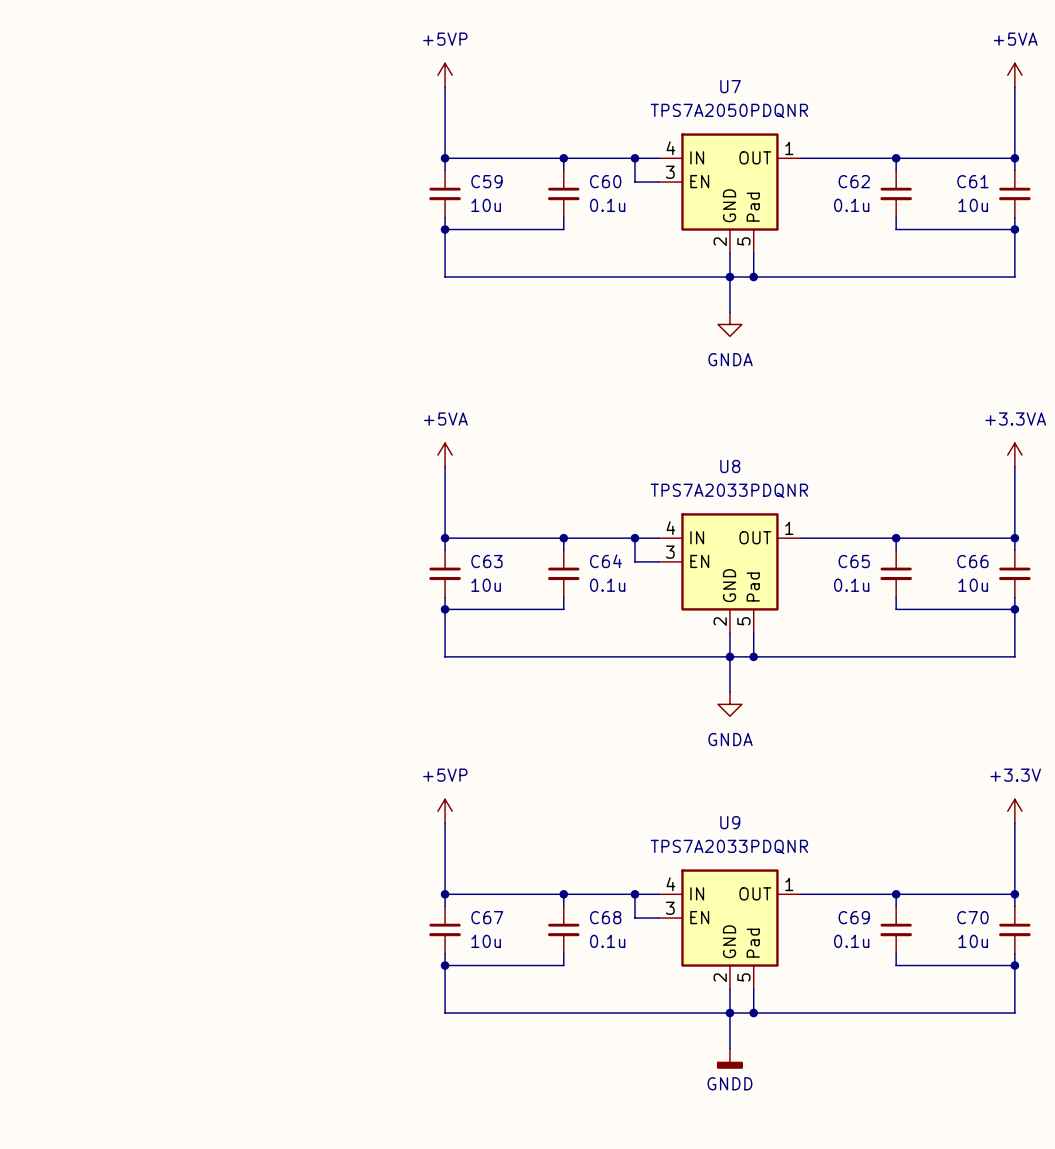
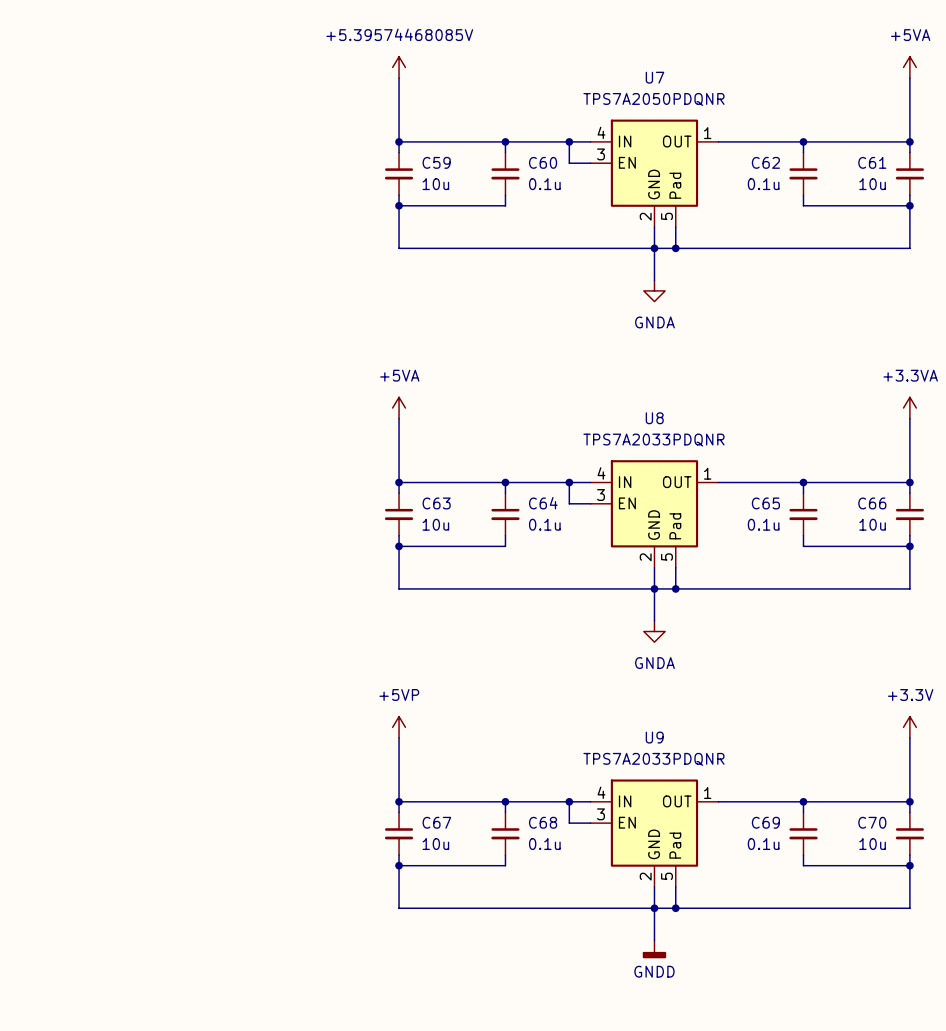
power symbol: +5VP (445, 75) -> +5.39574468085V (399, 67)

